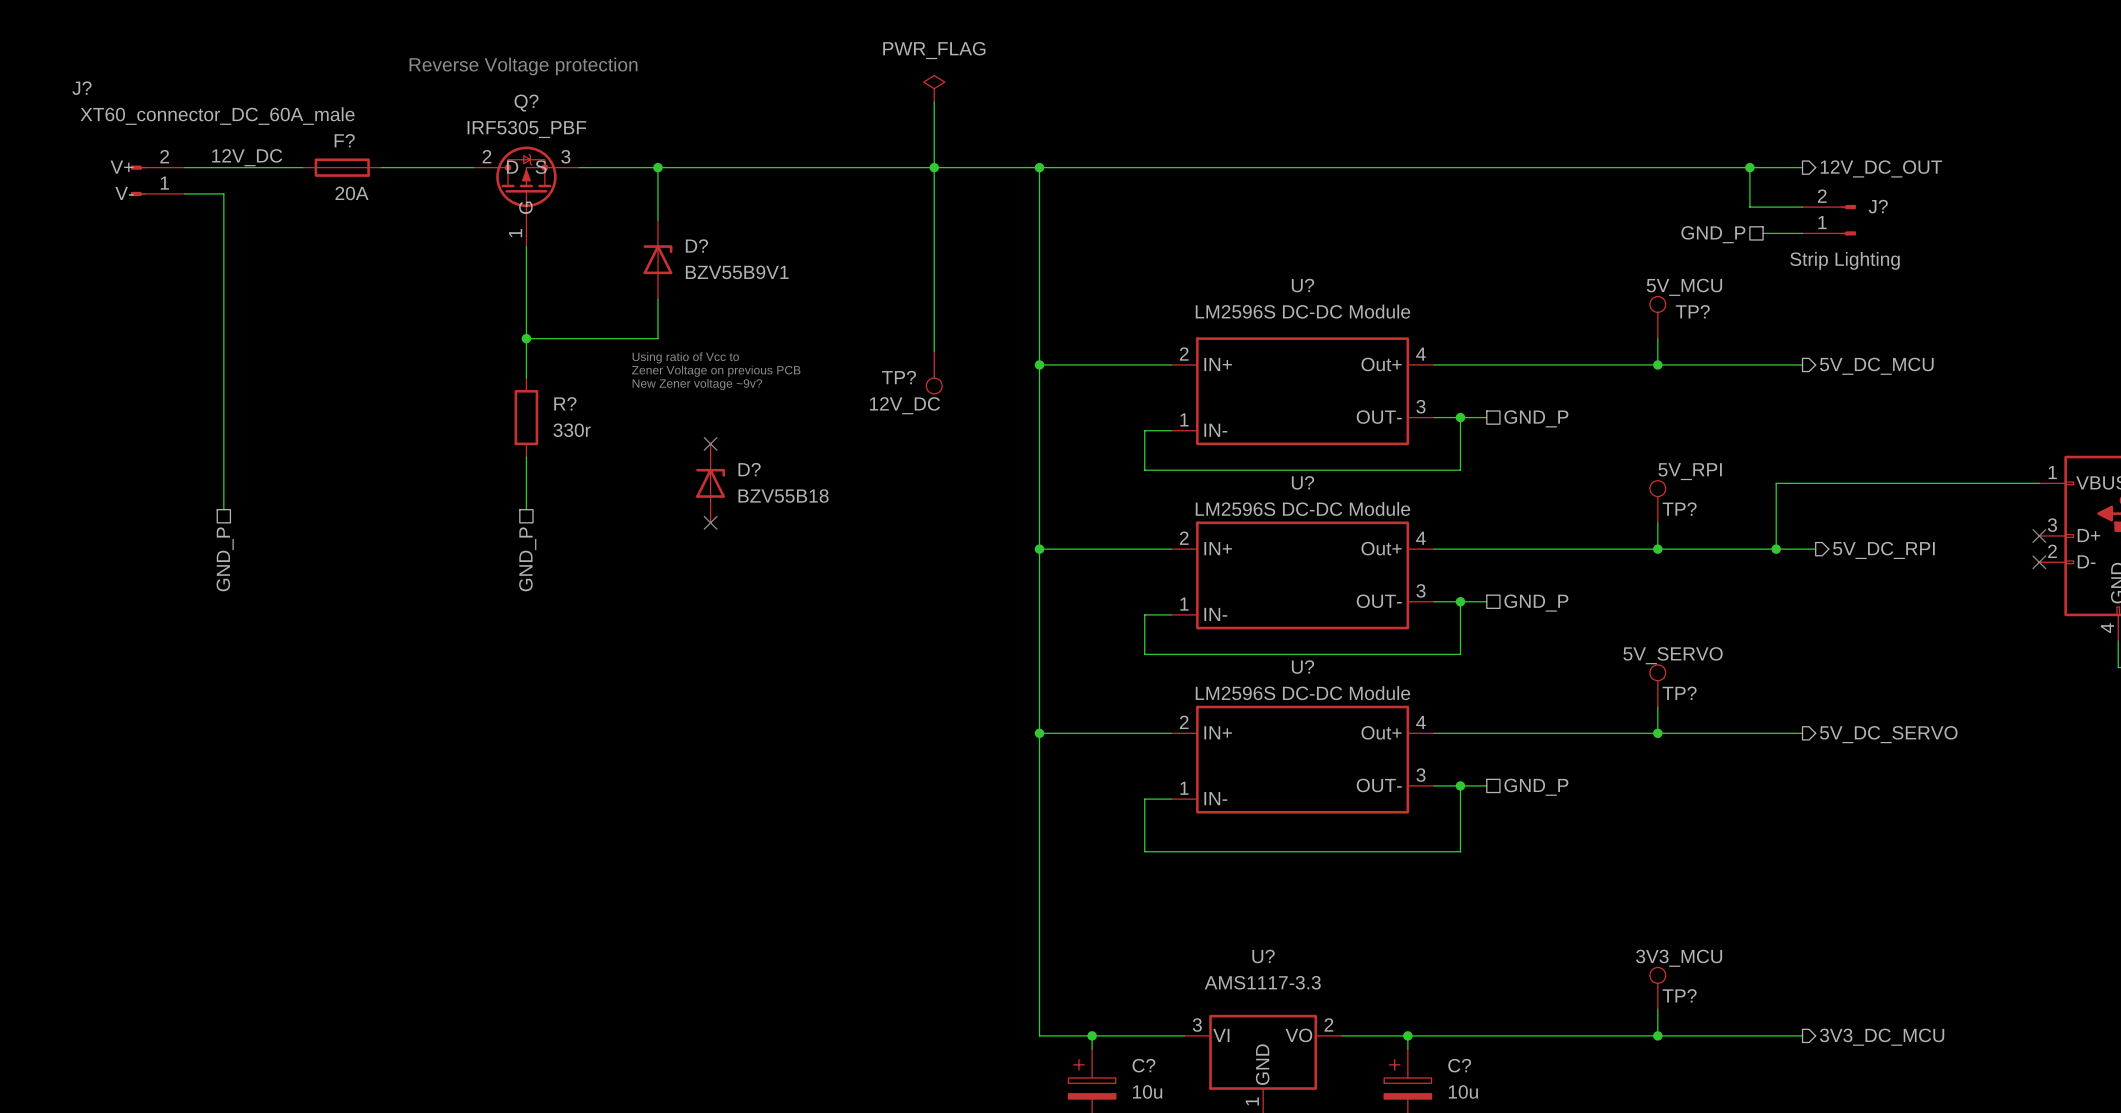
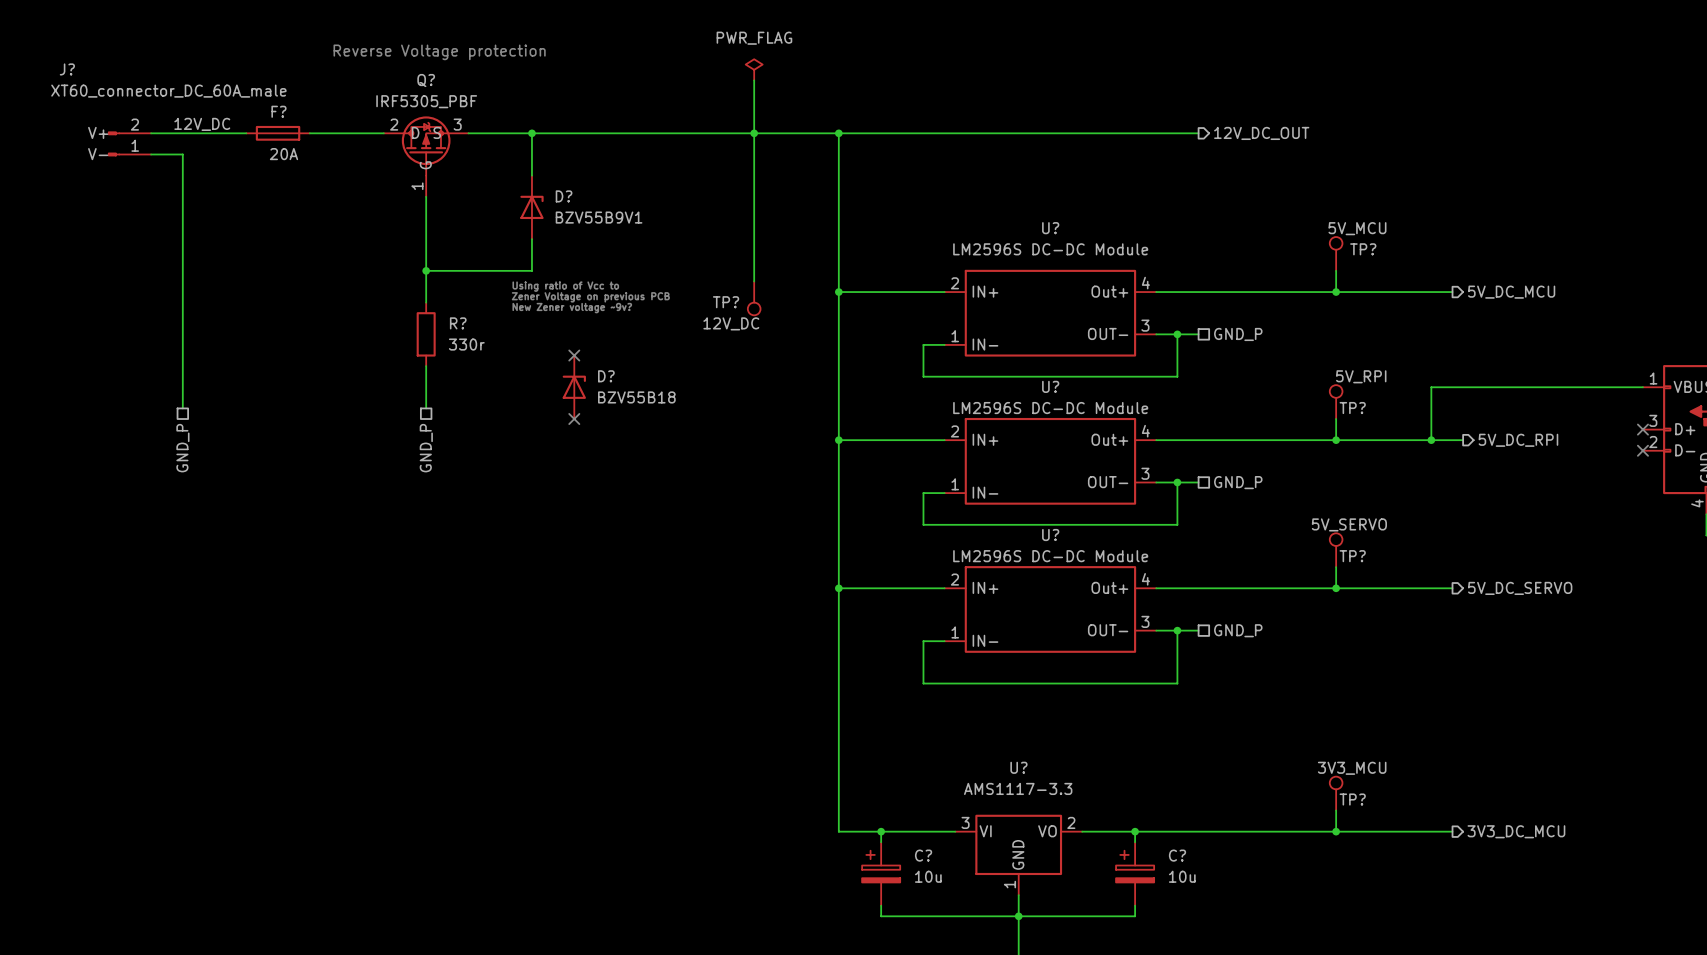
wire: (1486, 167) (1802, 167) -> none
wire: (1749, 167) (1749, 207) (1802, 207) -> none
junction: (1749, 167) -> none
hierarchical label: none -> 12V_DC_OUT (1261, 133)
hierarchical label: 12V_DC_OUT (1881, 168) -> none
J?: Strip Lighting (1829, 220) -> none
wire: (1763, 233) (1802, 233) -> none
hierarchical label: GND_P (1713, 234) -> none

